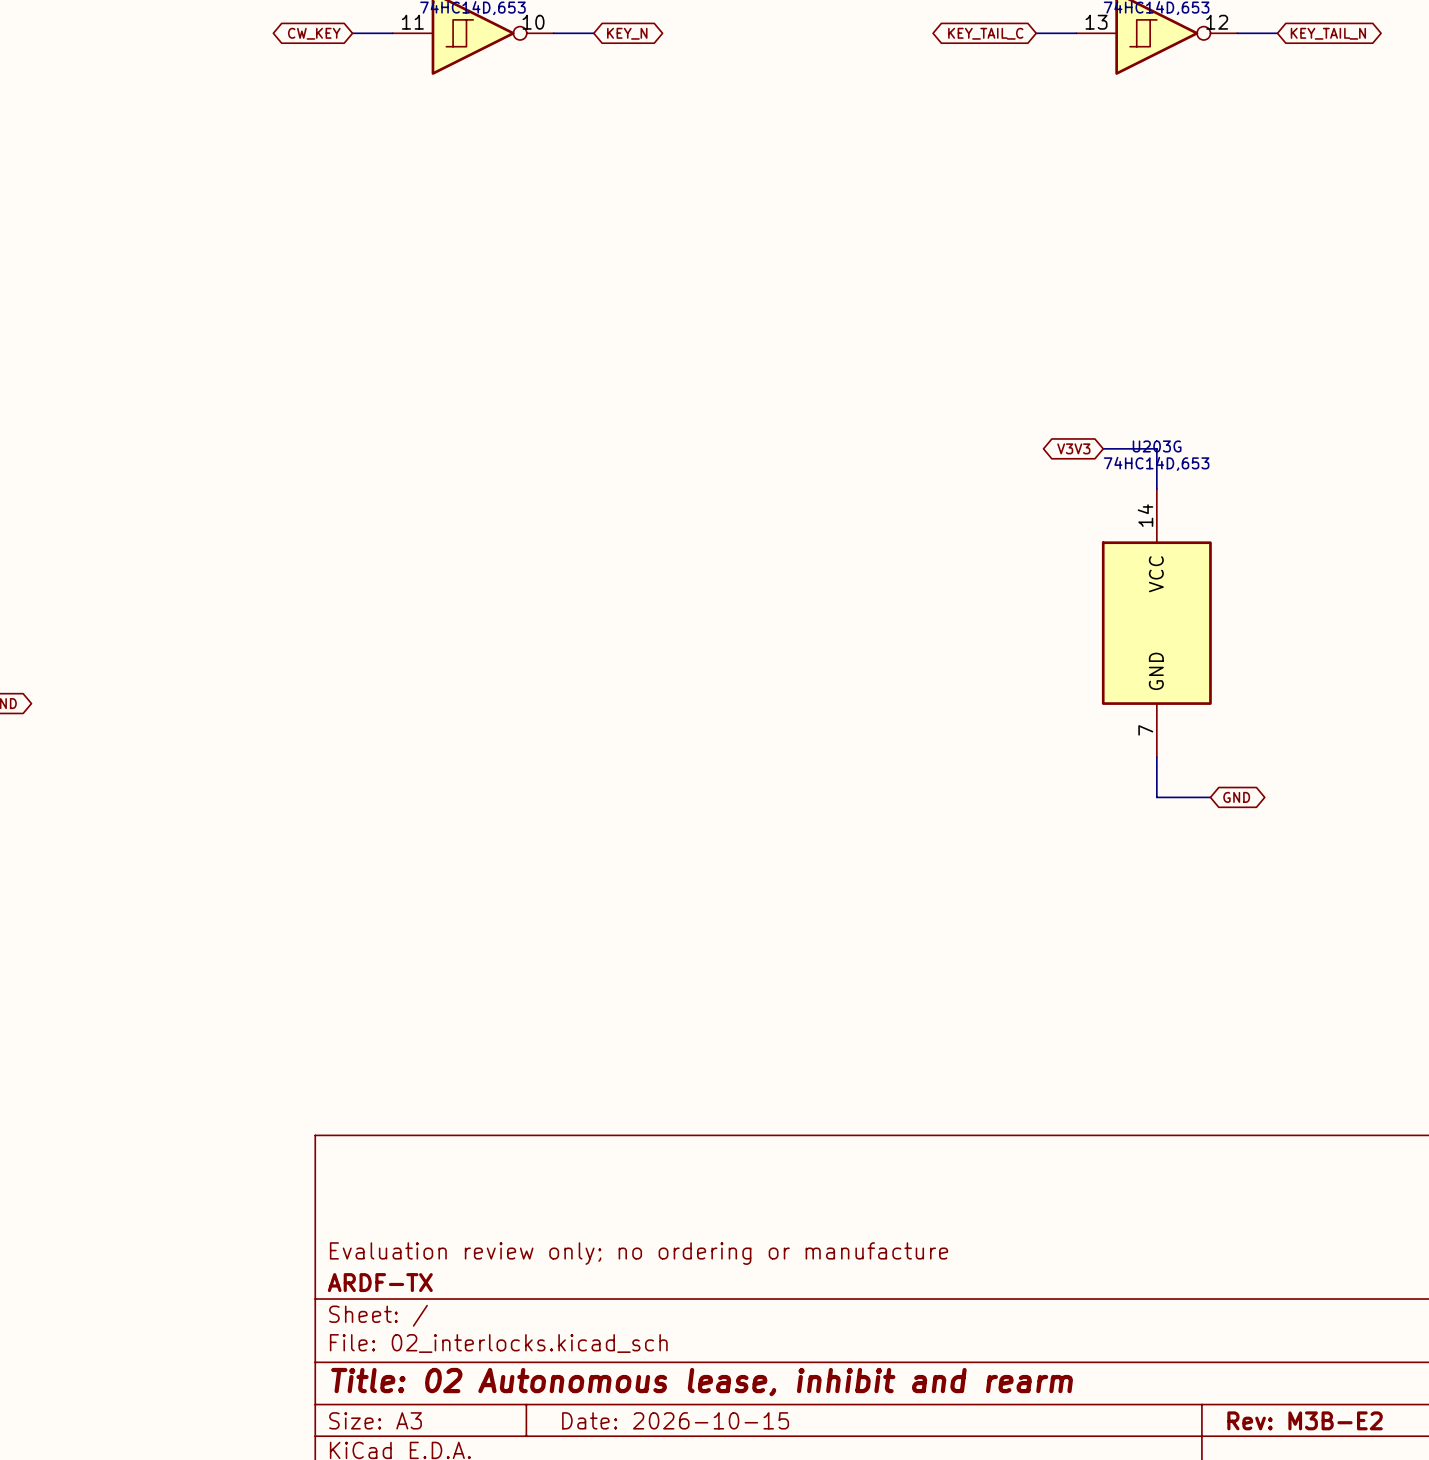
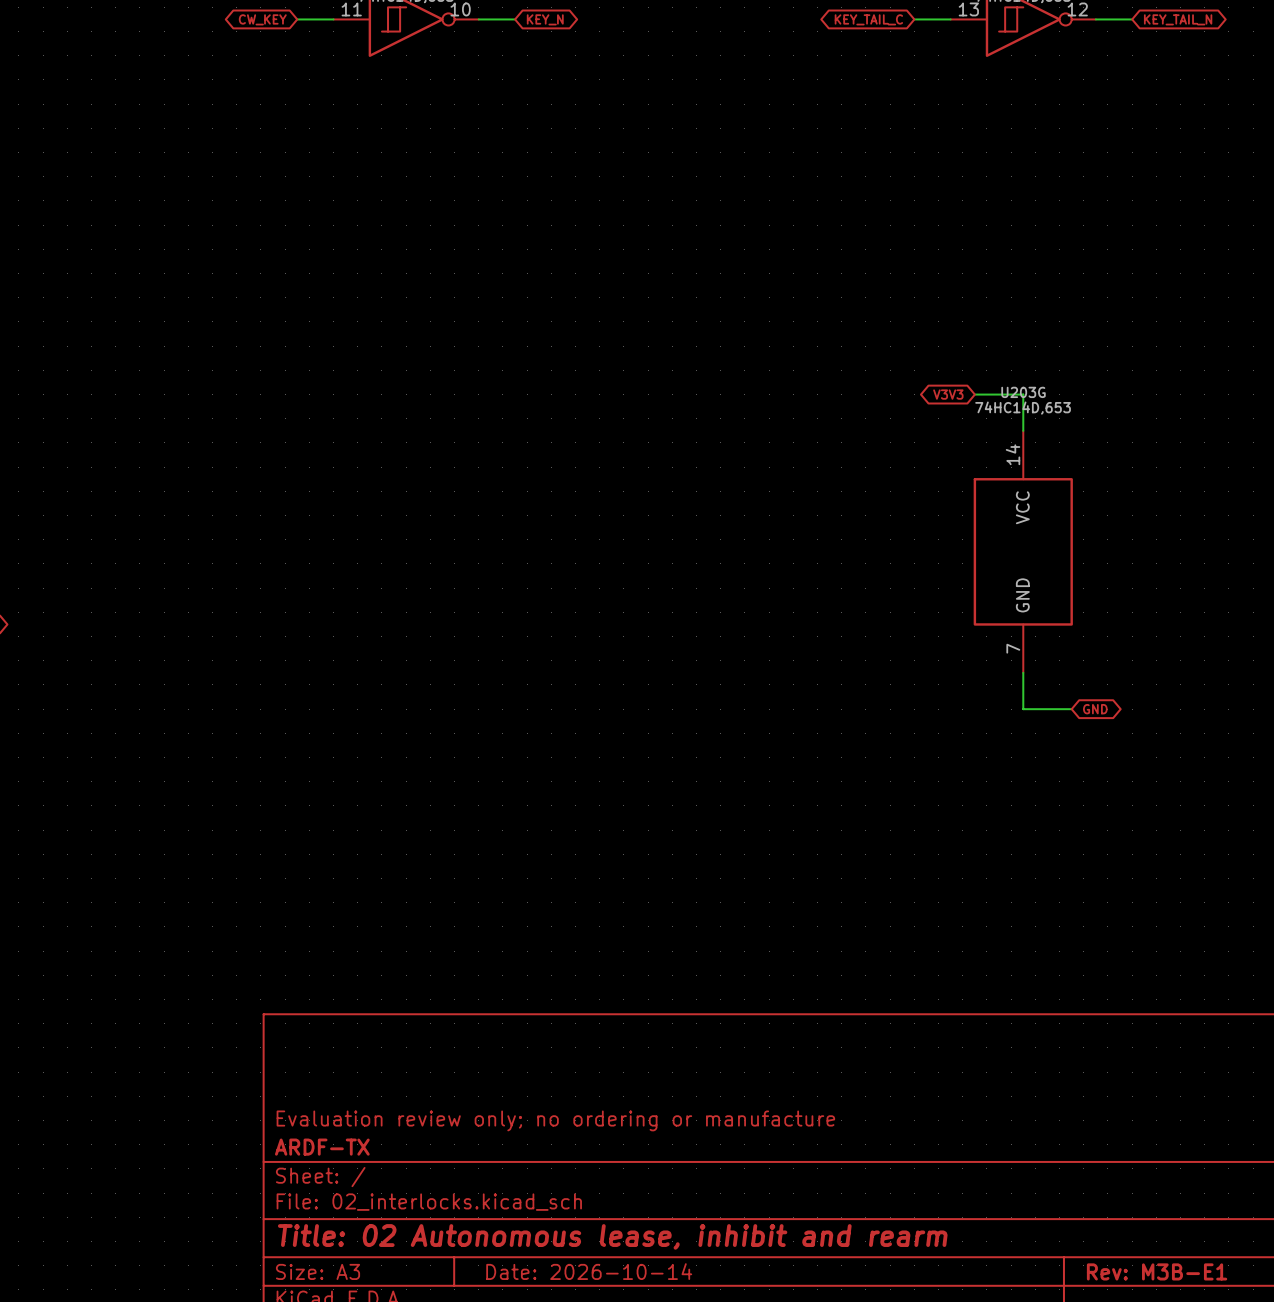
title block: Date: 2026-10-15 (675, 1420) -> Date: 2026-10-14 (589, 1271)
title block: Rev: M3B-E2 (1305, 1420) -> Rev: M3B-E1 (1157, 1271)

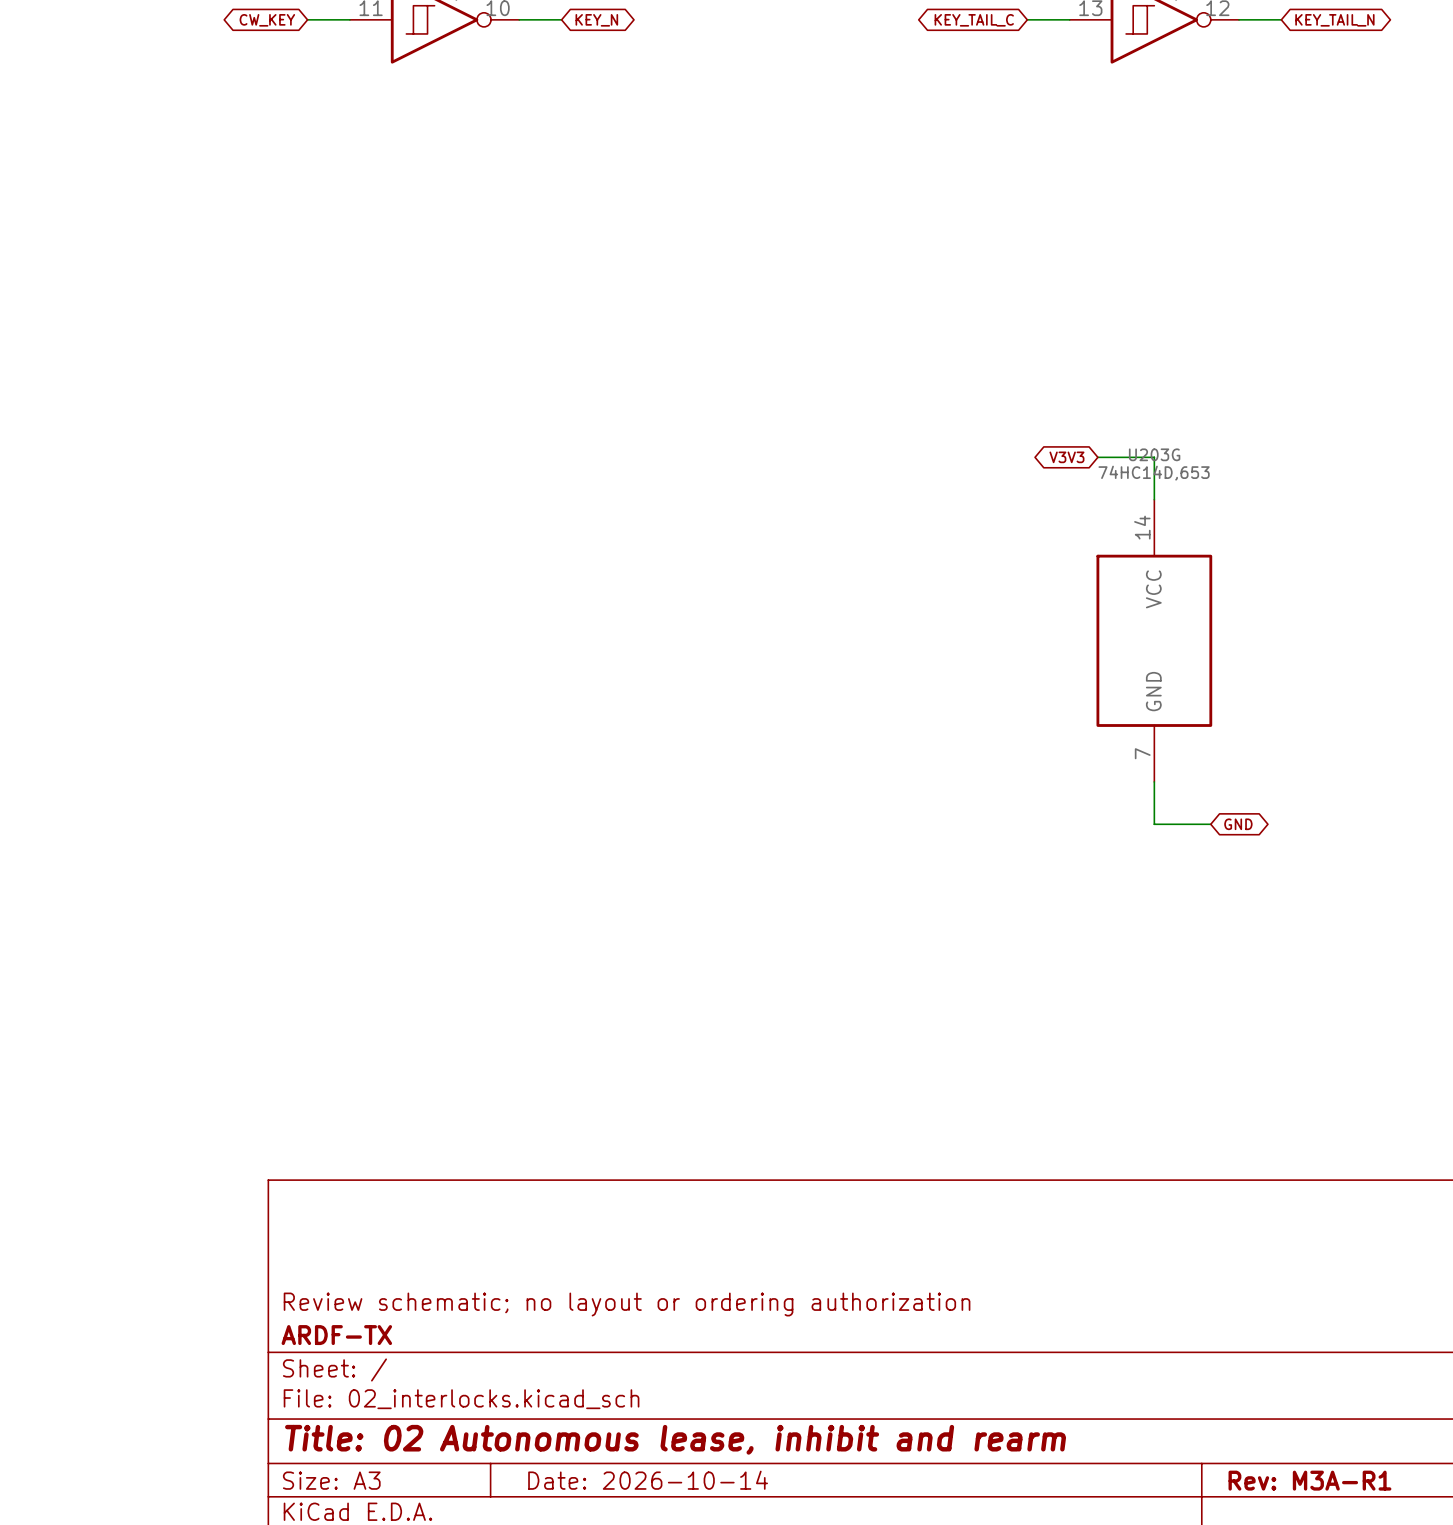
title block: Evaluation review only; no ordering or manufacture (555, 1120) -> Review schematic; no layout or ordering authorization (627, 1304)
title block: Rev: M3B-E1 (1157, 1271) -> Rev: M3A-R1 (1309, 1480)

